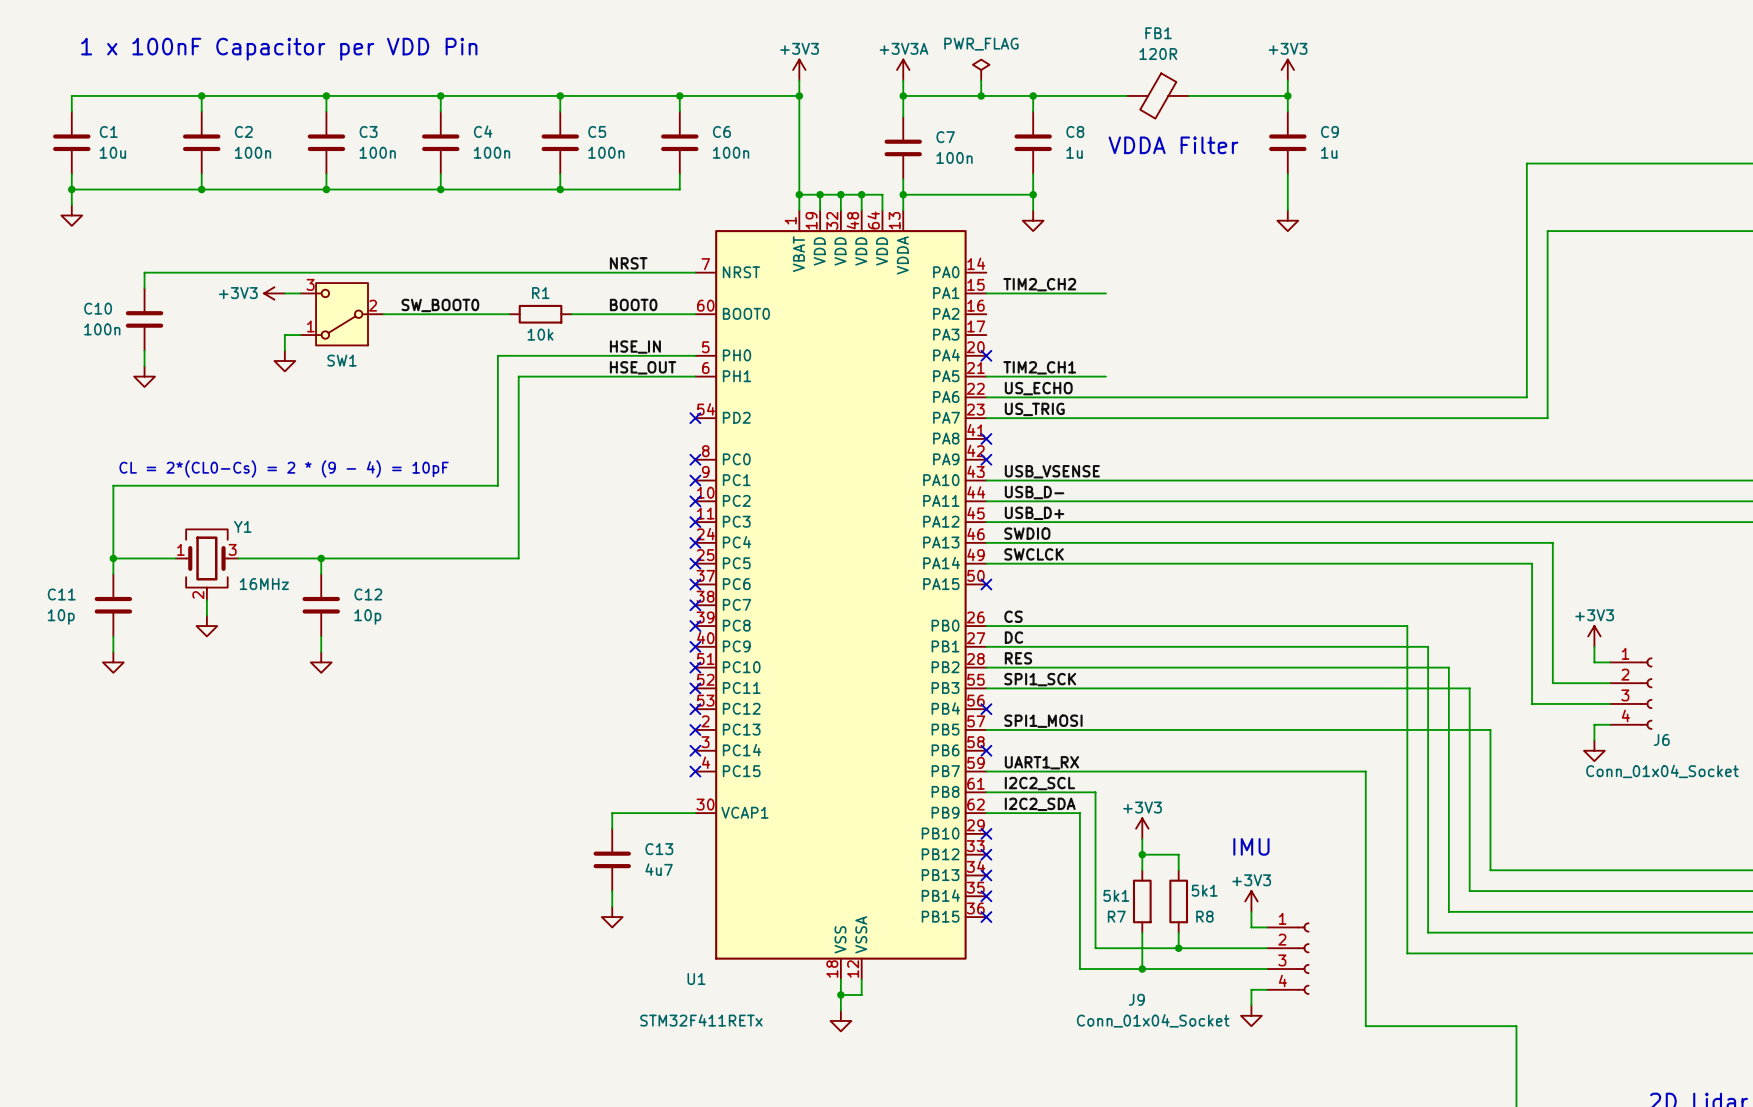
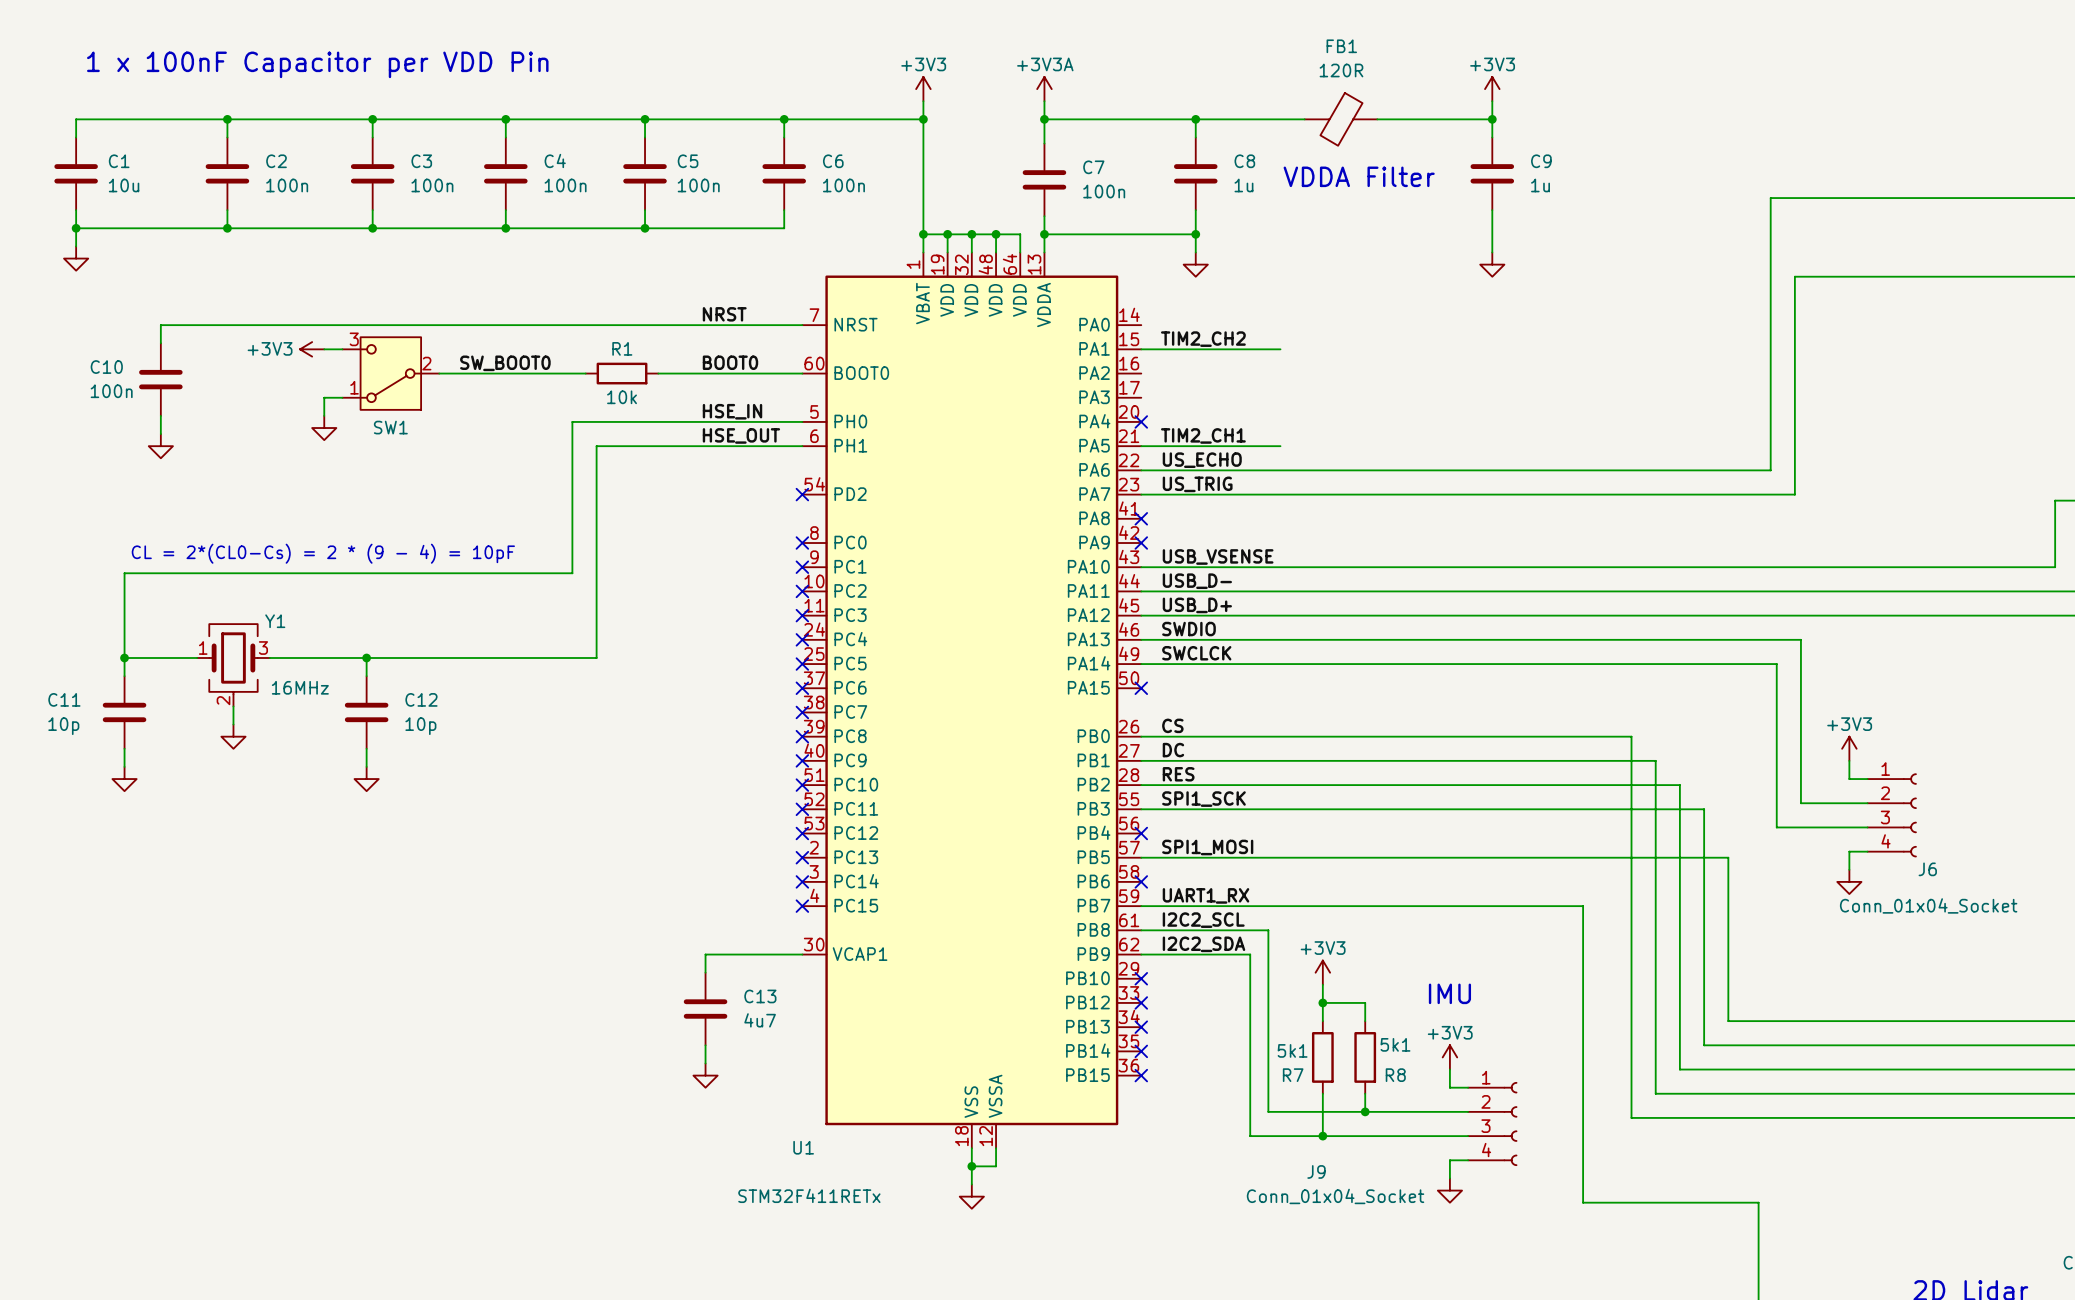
power symbol: PWR_FLAG (981, 69) -> none
wire: (981, 80) (981, 95) -> none
junction: (981, 95) -> none

